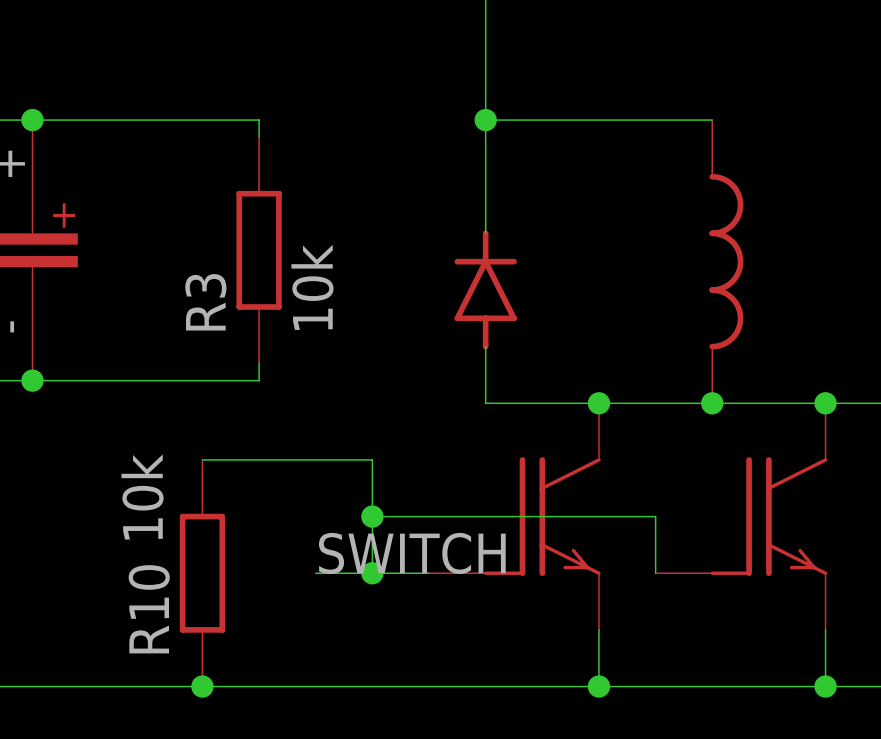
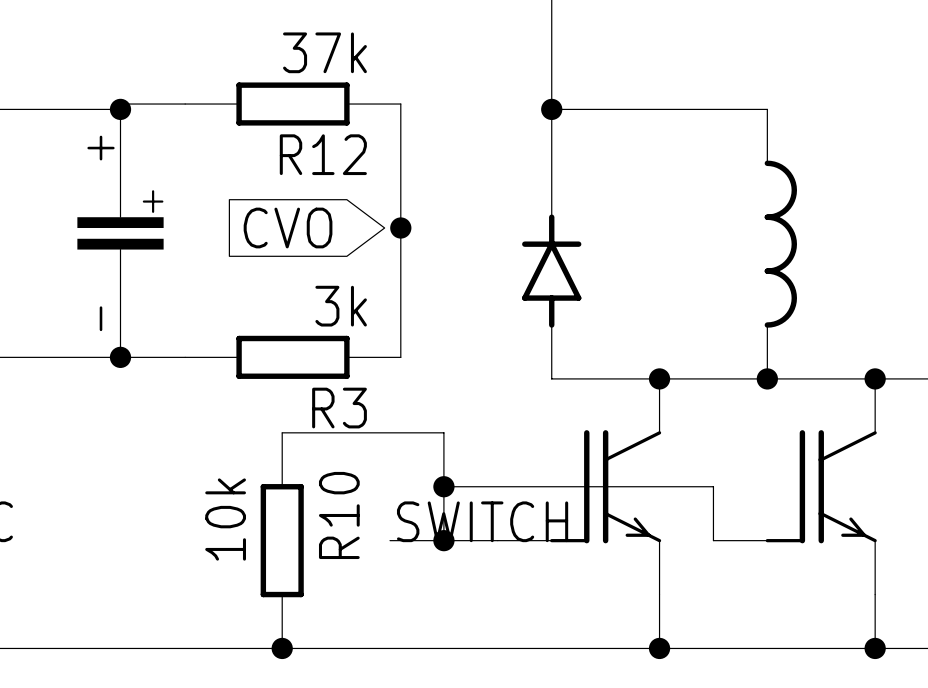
R12: none -> 37k (292, 104)
wire: none -> (400, 104) (400, 357)
wire: (32, 120) (259, 120) (259, 137) -> (120, 109) (120, 104) (185, 104)
global label: none -> CVO (288, 228)
junction: none -> (400, 228)
R3 rotation: 0° (259, 250) -> 90° clockwise (292, 357)
R3 position: (259, 250) -> (292, 357)
R3 value: 10k (312, 287) -> 3k (341, 306)
R3 name position: R3 (205, 302) -> R3 (339, 408)
wire: (259, 363) (259, 380) (100, 380) -> none
R10 value position: 10k (142, 496) -> 10k (225, 519)
R10 name position: R10 (149, 609) -> R10 (339, 515)

